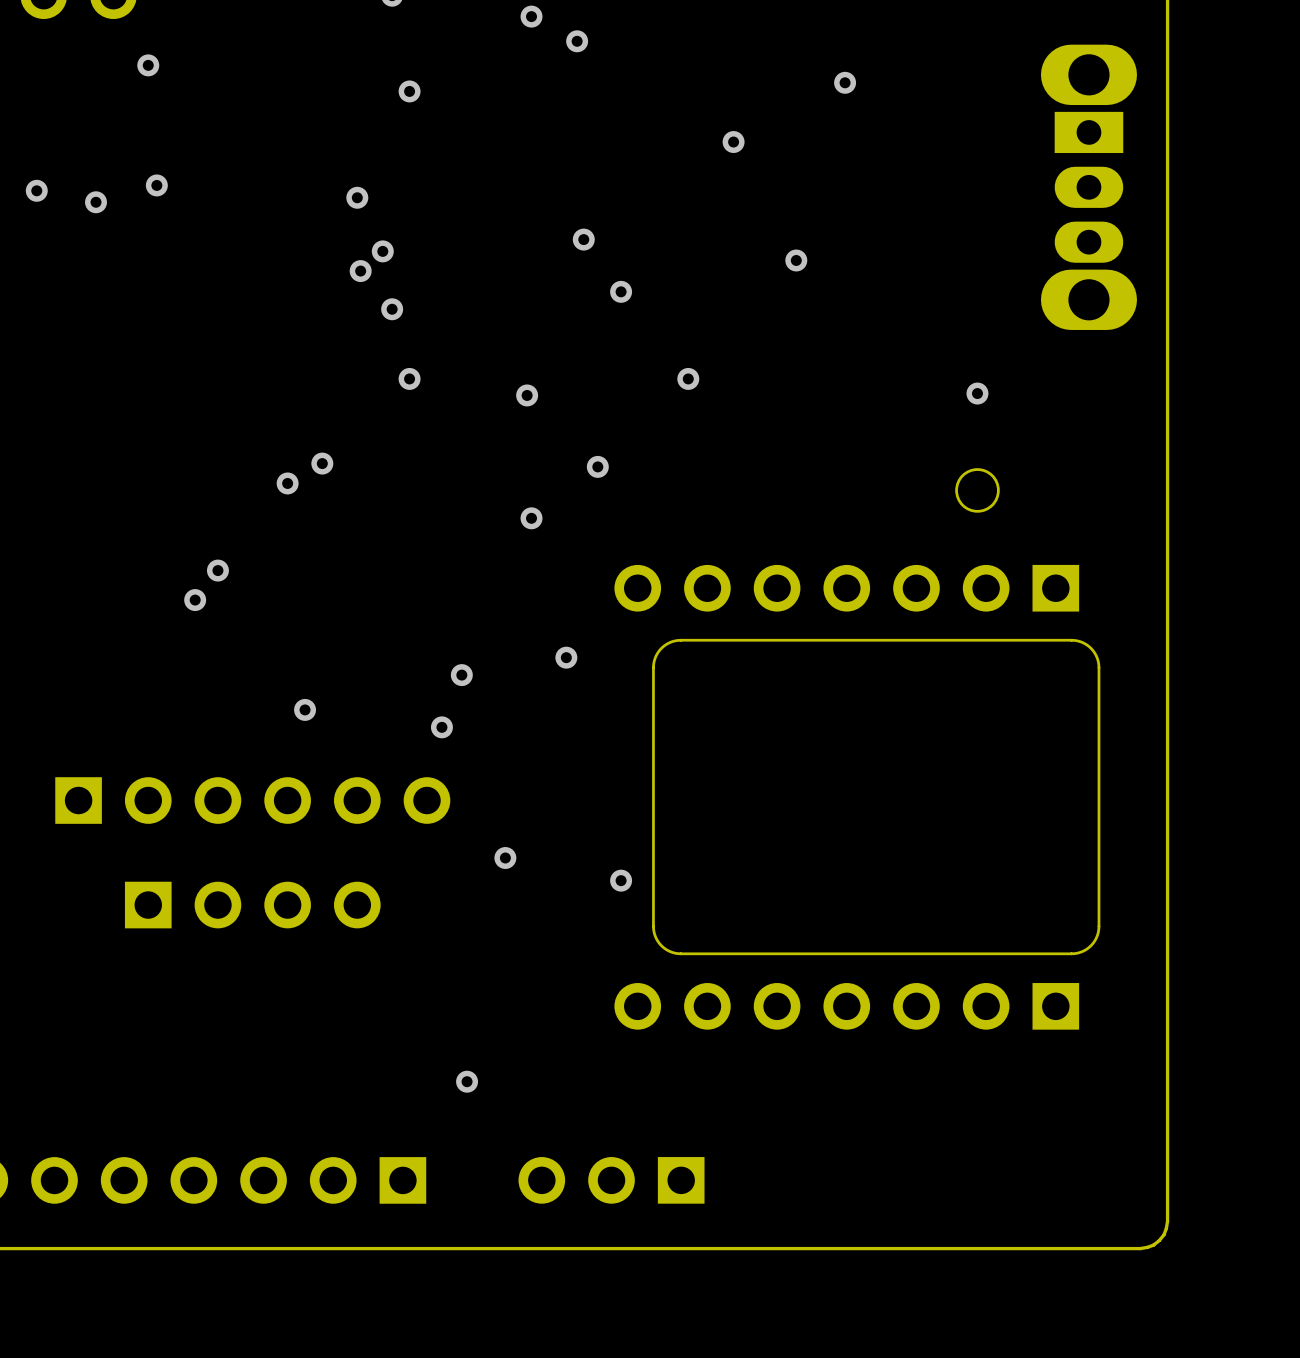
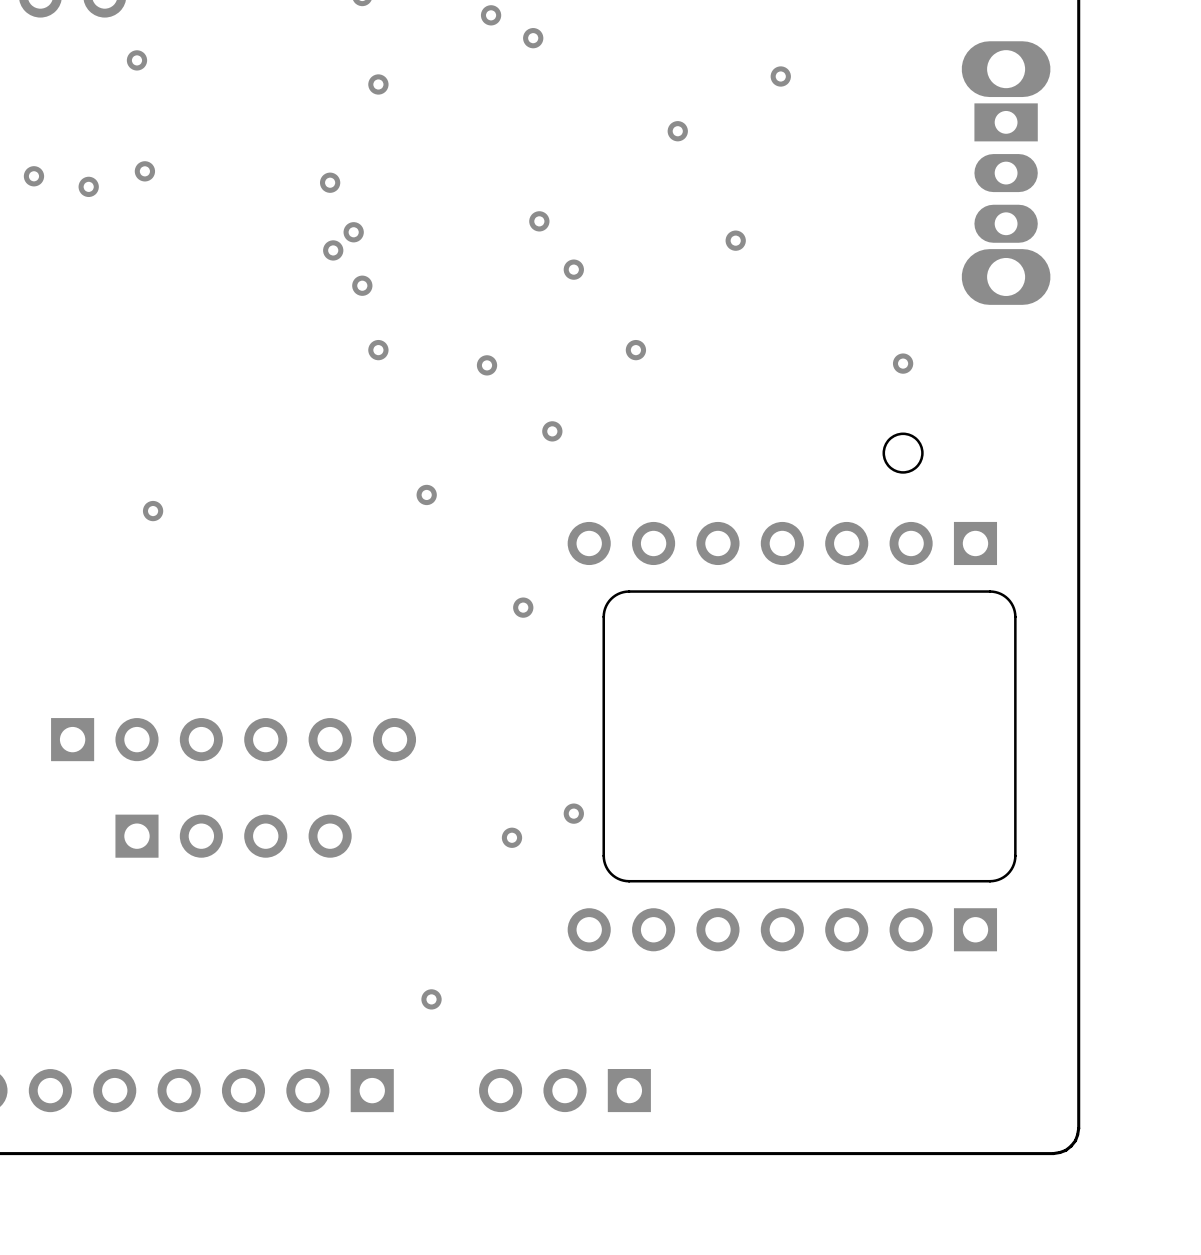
via: (322, 463) -> none
via: (287, 483) -> none
via: (531, 518) -> none
via: none -> (426, 494)
via: none -> (153, 511)
via: (217, 570) -> none
via: (195, 600) -> none
via: (461, 675) -> none
via: (305, 709) -> none
via: (441, 727) -> none
via position: (505, 858) -> (511, 837)

